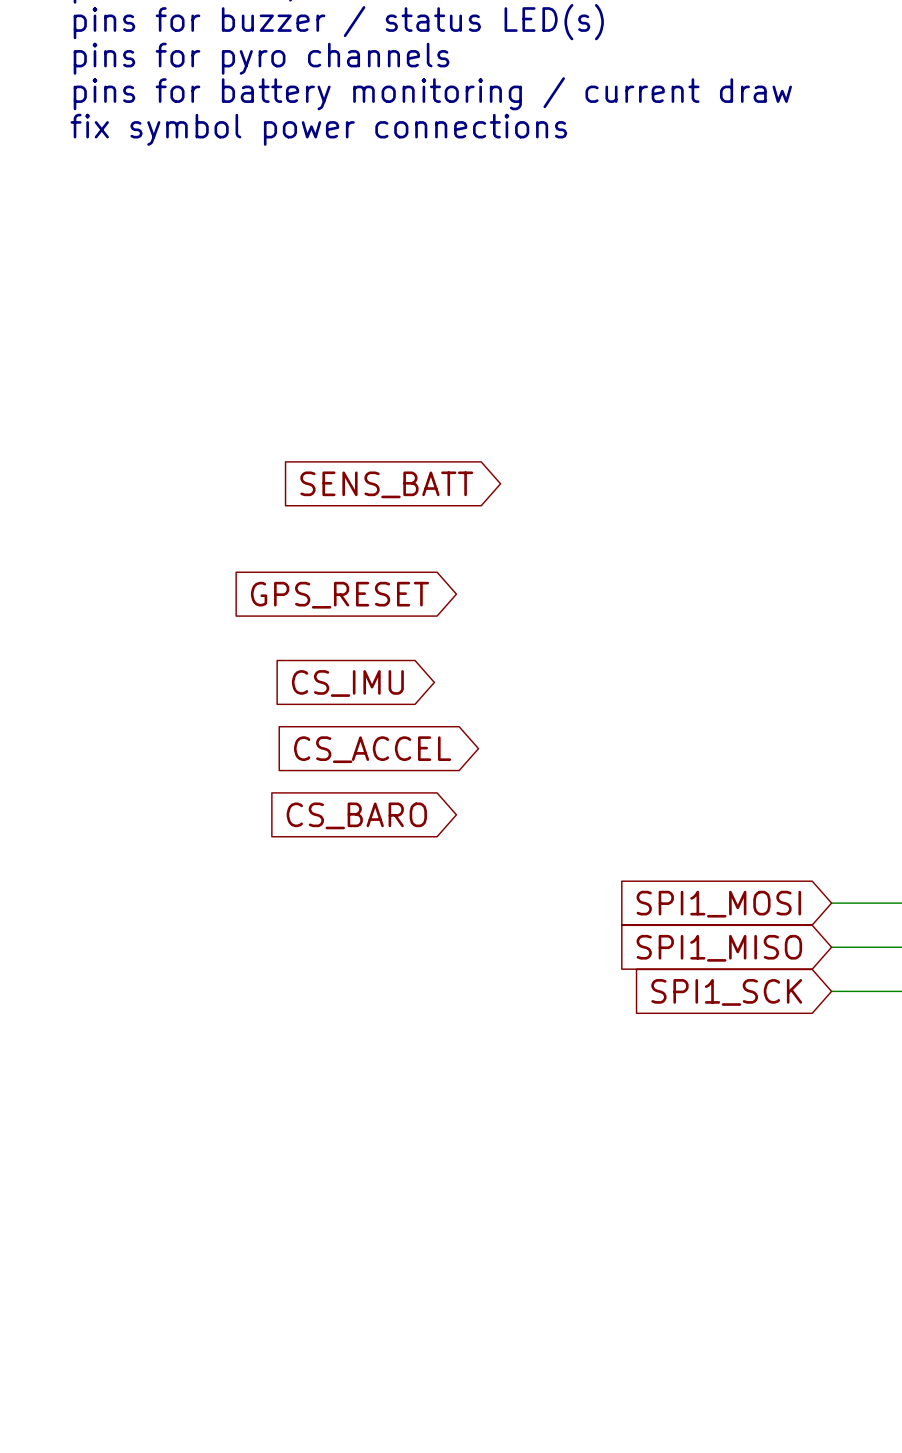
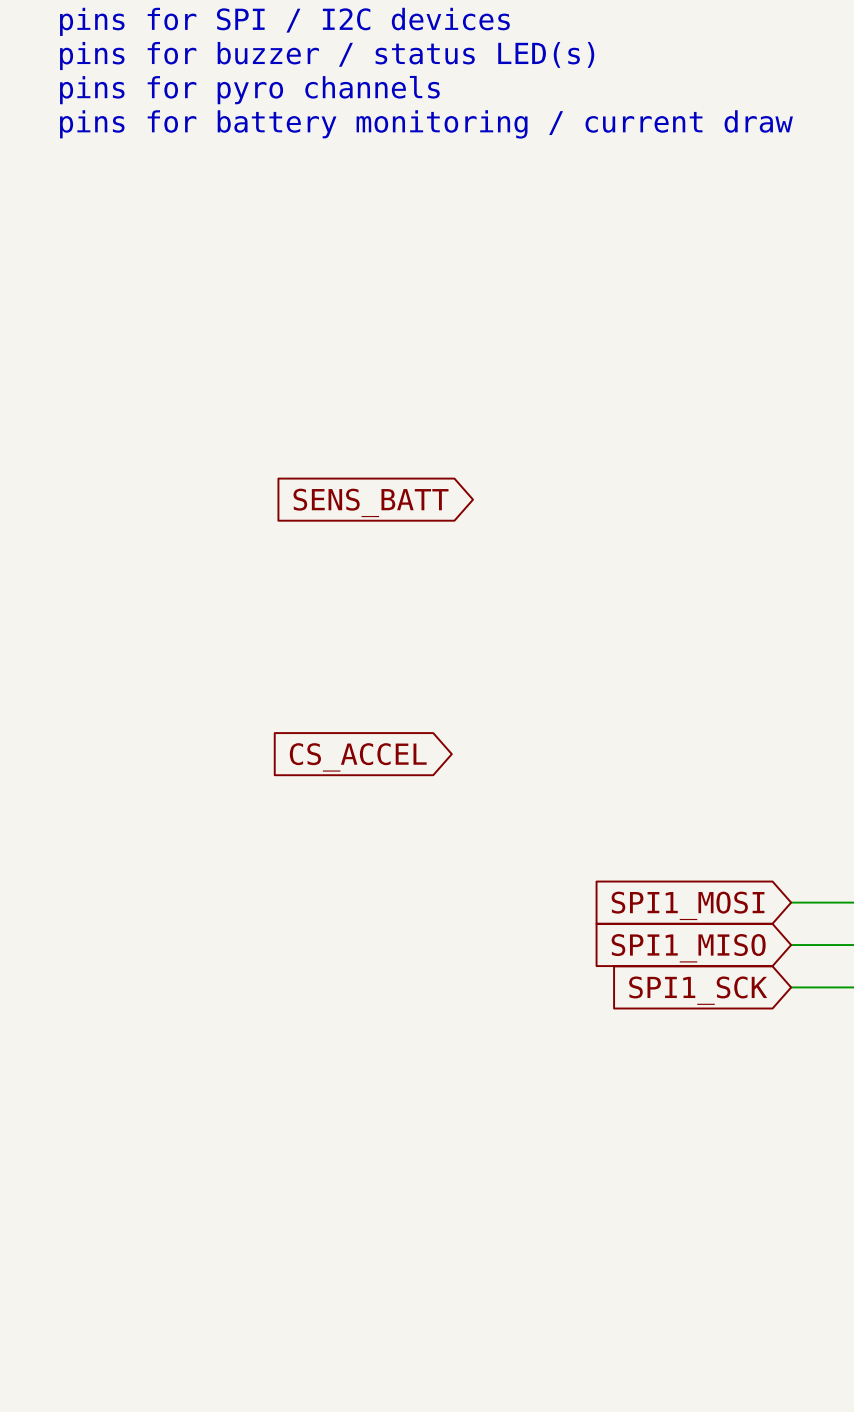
text: fix symbol power connections (318, 129) -> none
global label: GPS_RESET (339, 595) -> none
global label: CS_IMU (347, 683) -> none
global label: CS_BARO (356, 815) -> none

